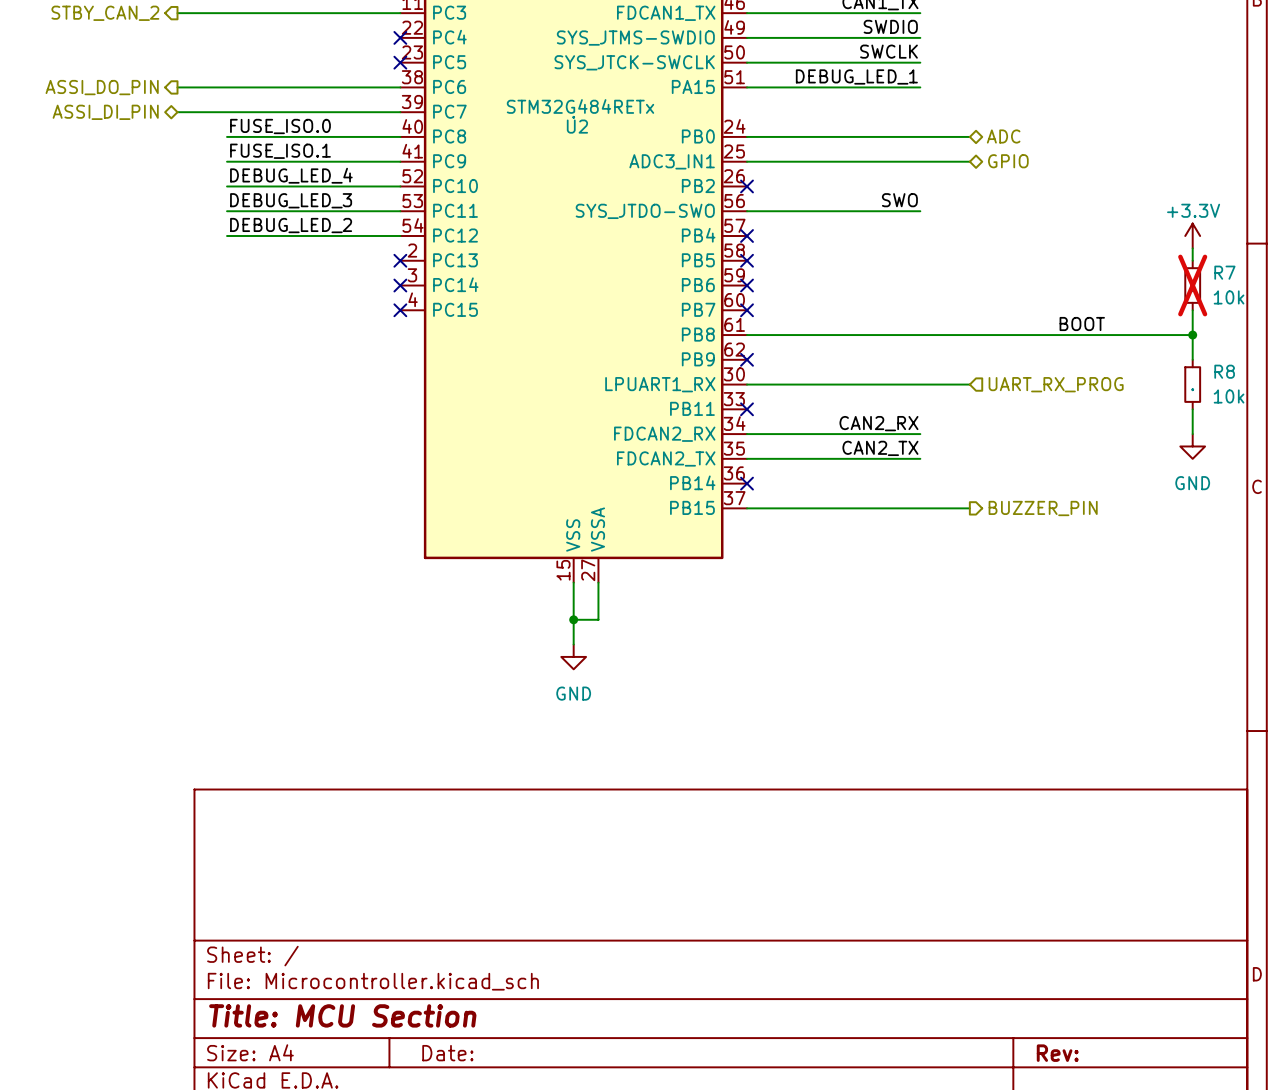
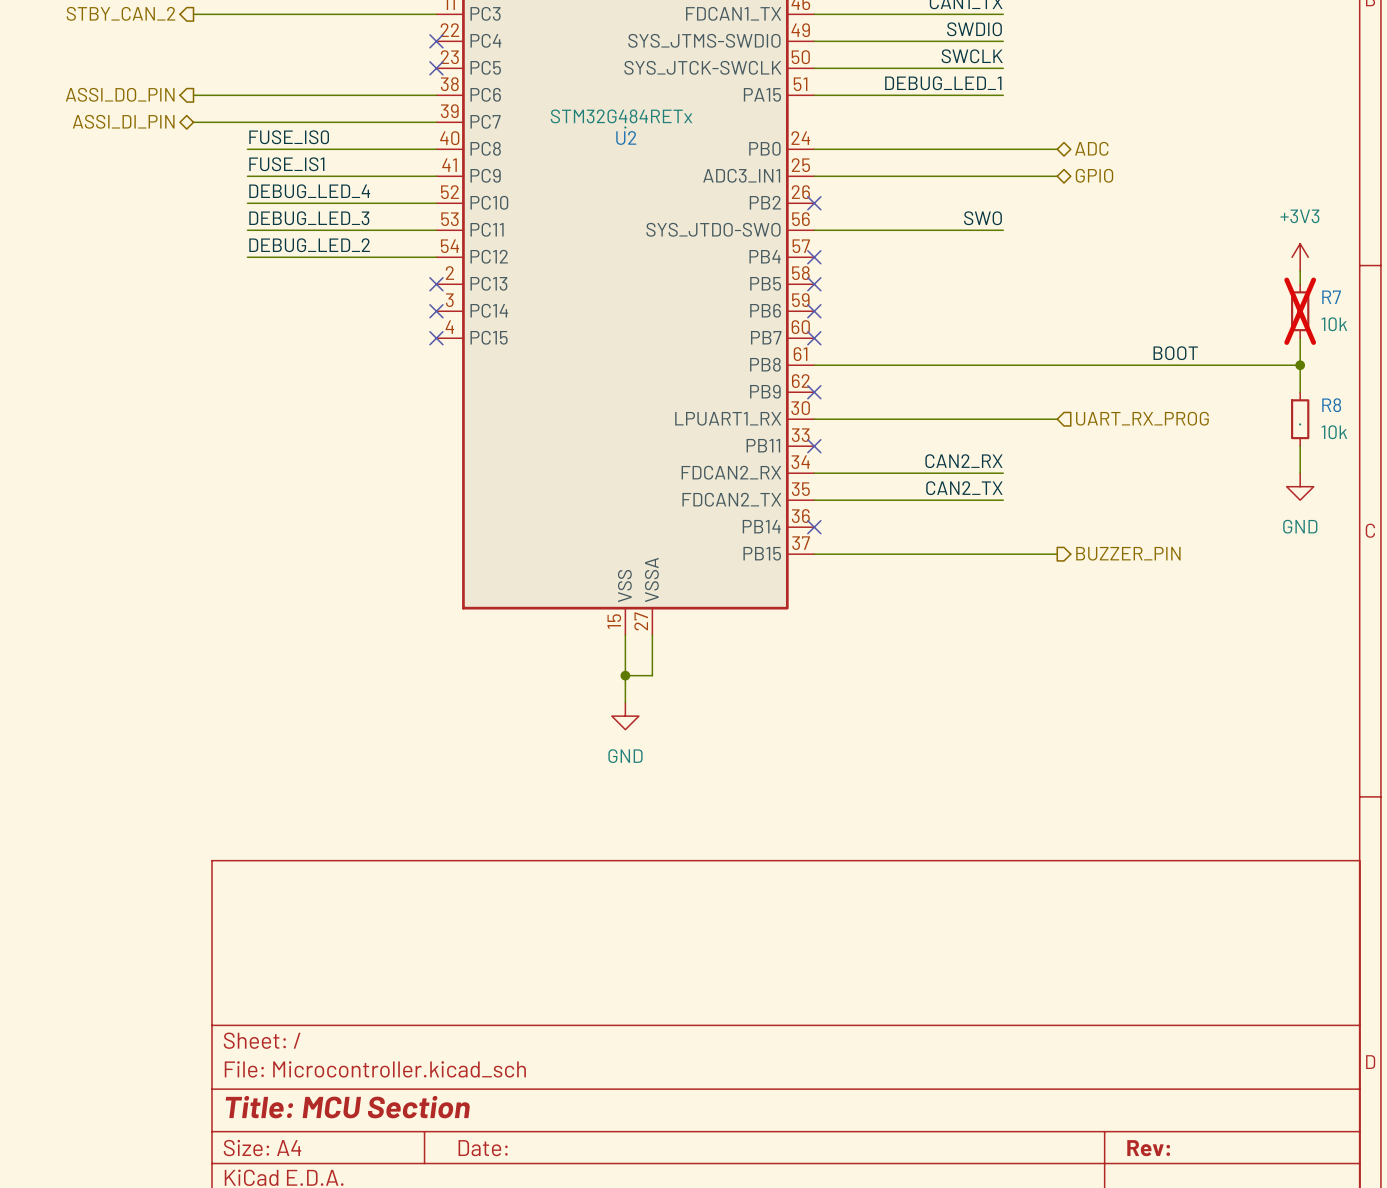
label: FUSE_ISO.0 (280, 126) -> FUSE_IS0 (289, 137)
label: FUSE_ISO.1 (280, 151) -> FUSE_IS1 (286, 164)
power symbol: +3.3V (1192, 236) -> +3V3 (1300, 257)

